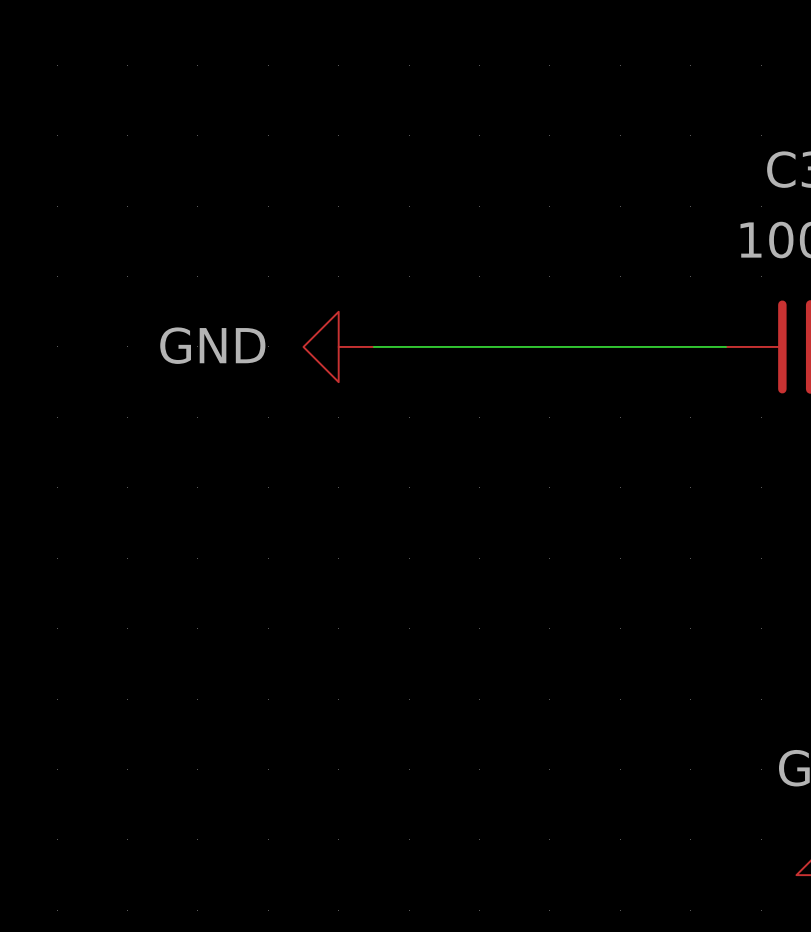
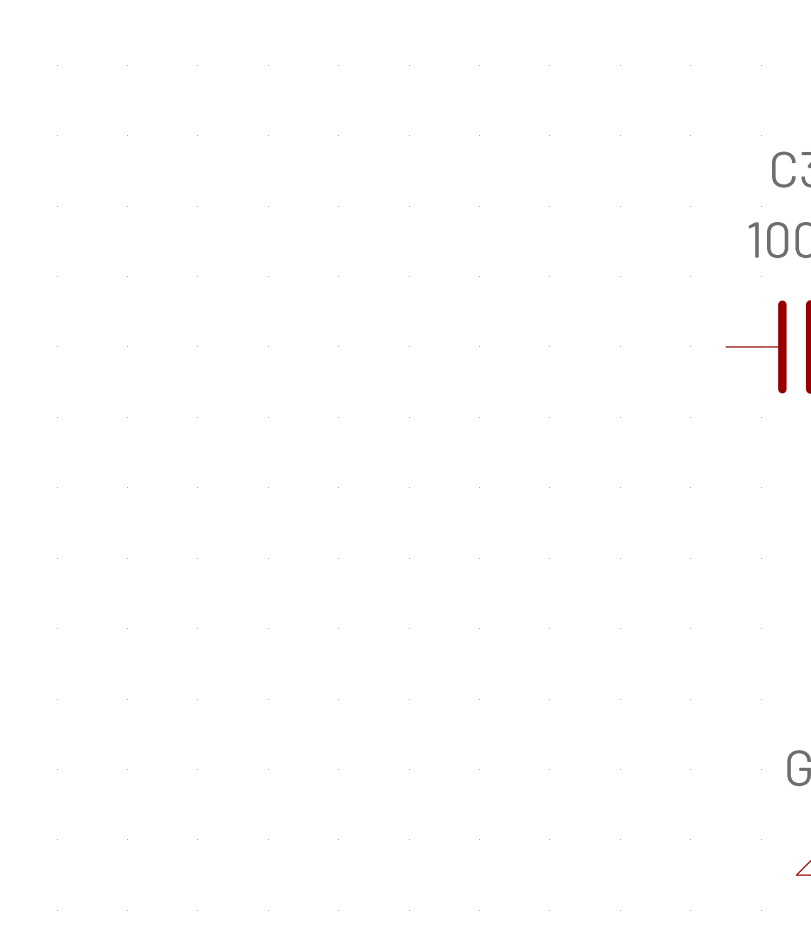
power symbol: GND (338, 346) -> none
wire: (373, 346) (726, 346) -> none

